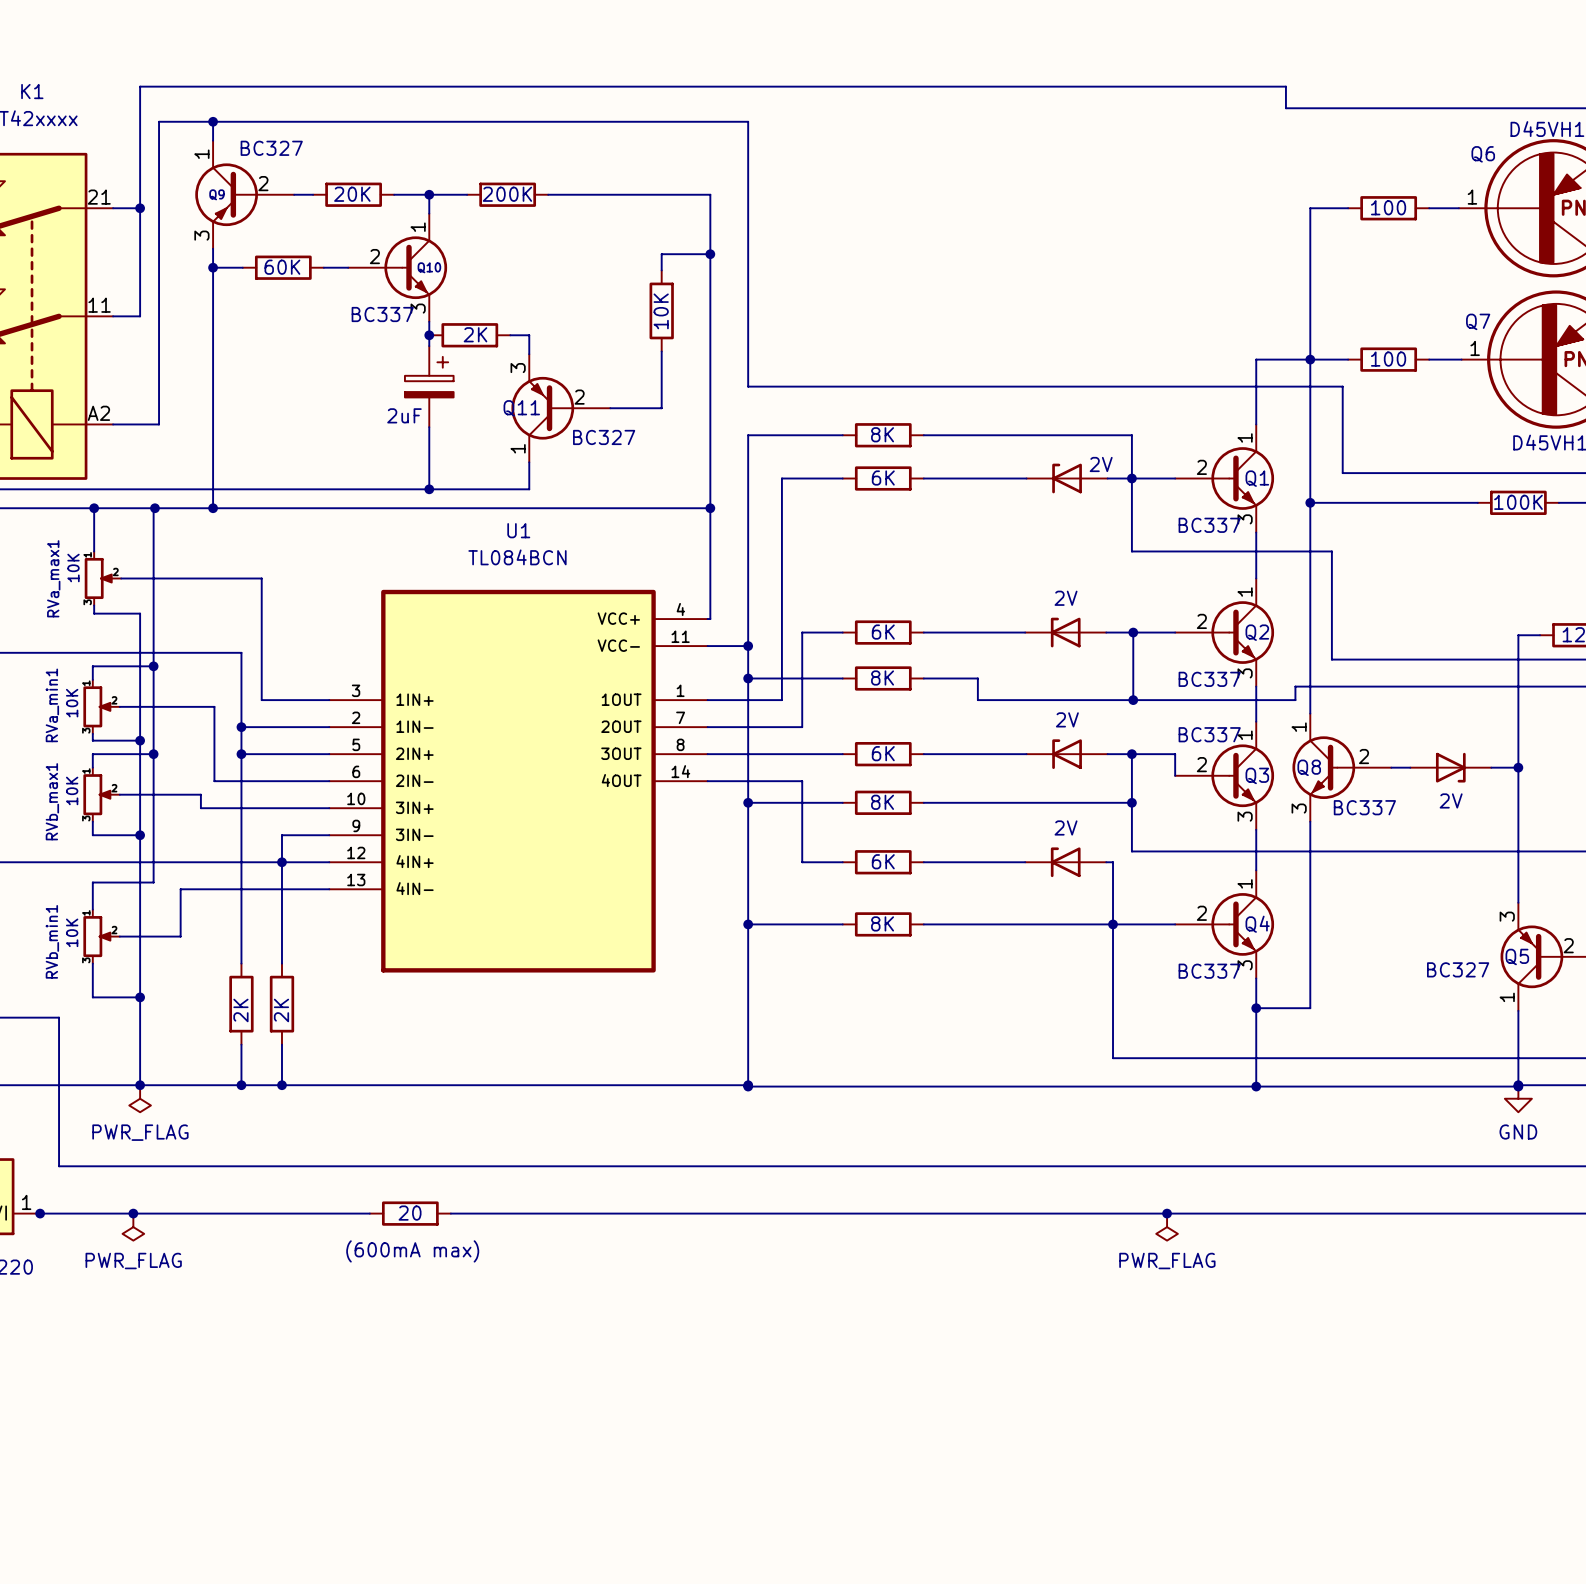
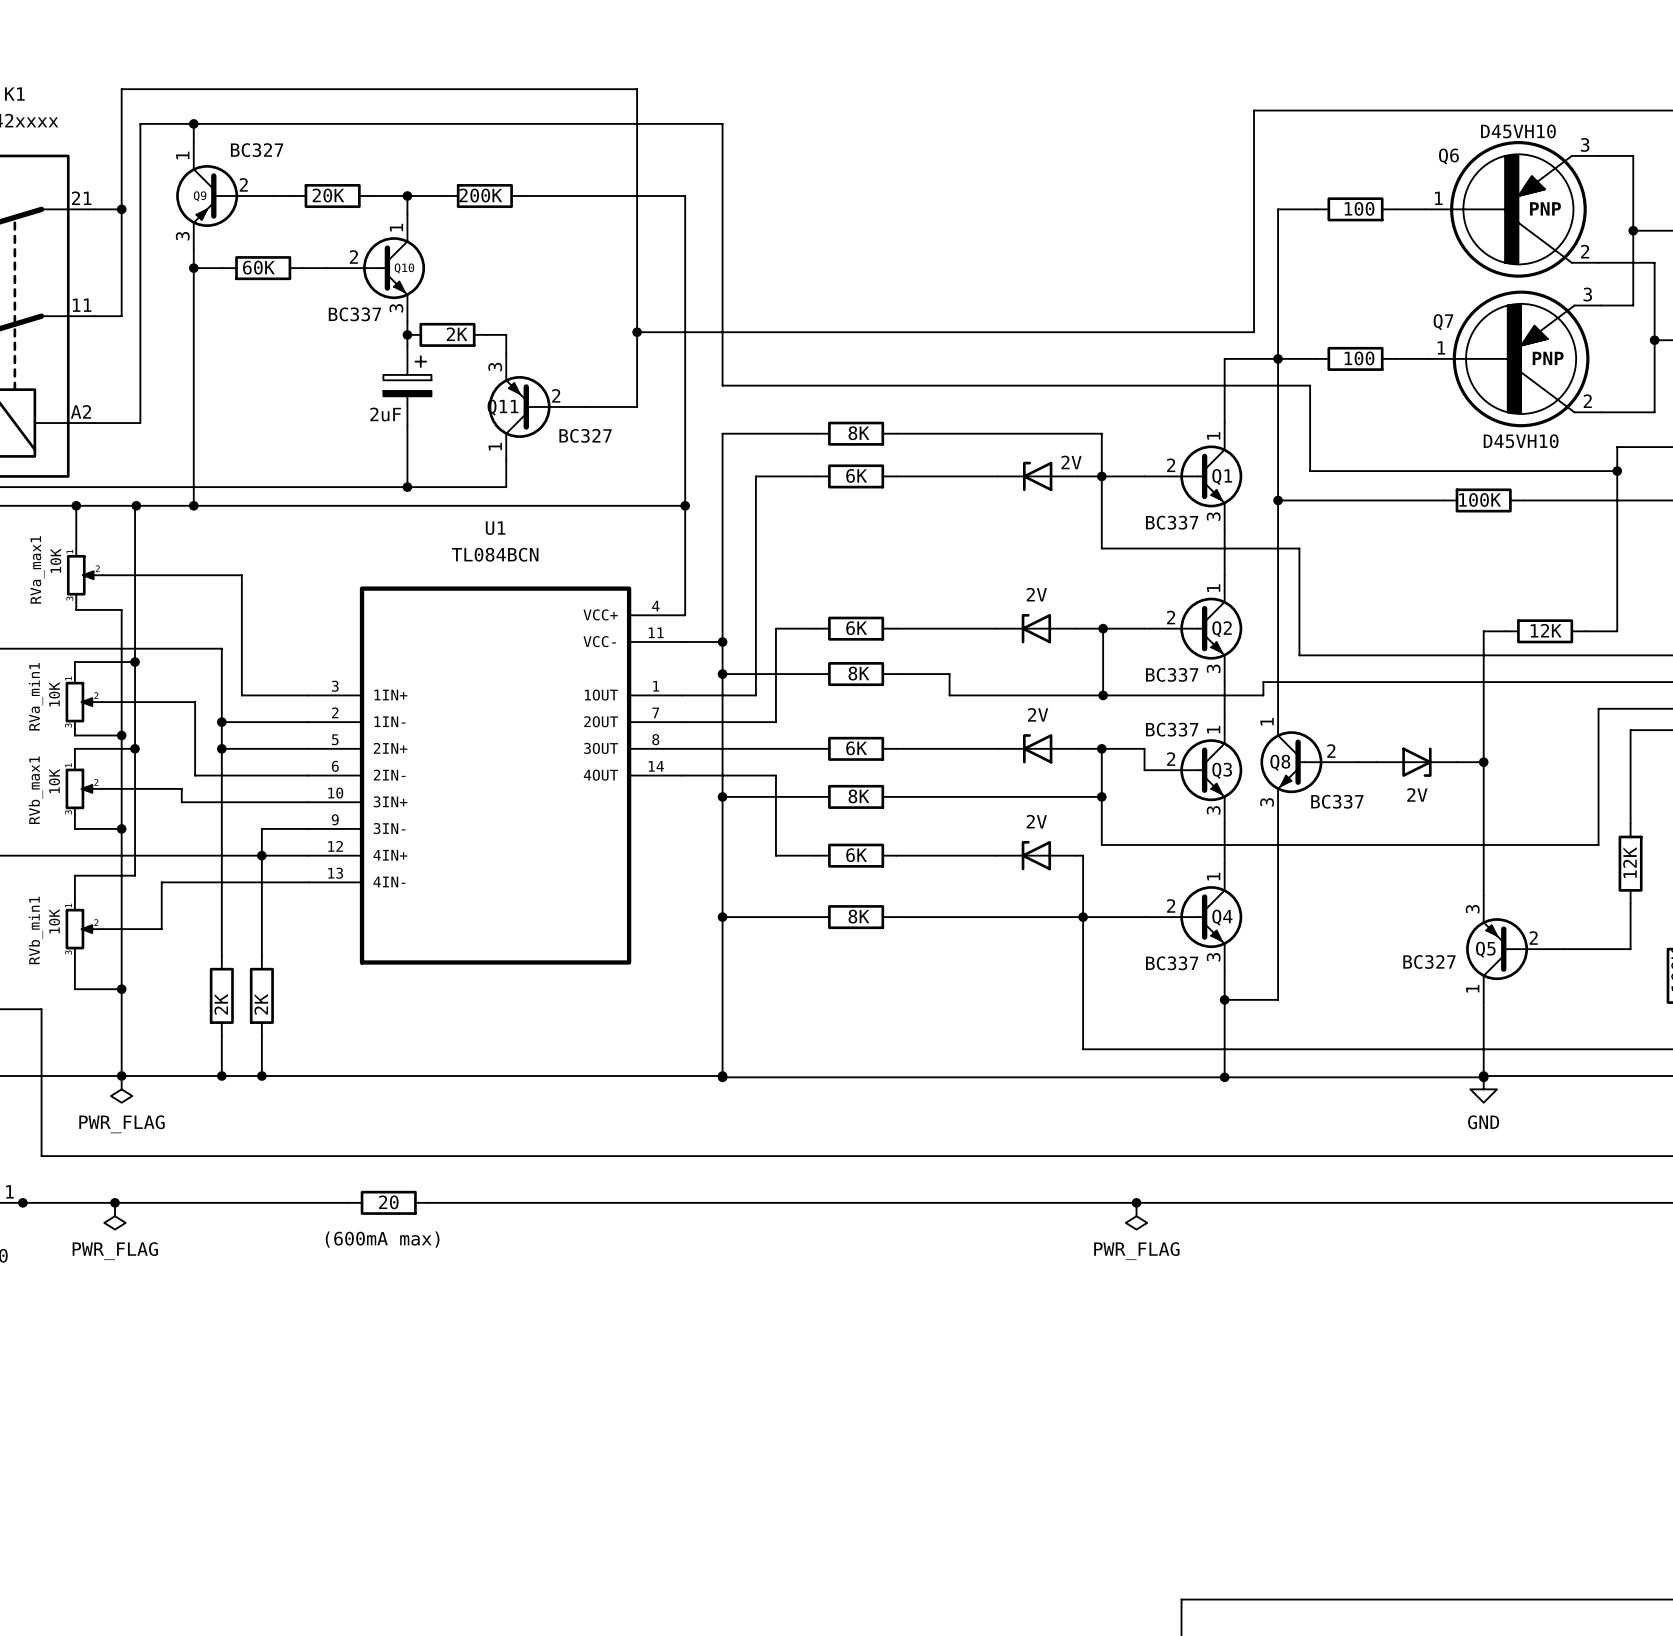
wire: (661, 86) (1285, 86) (1285, 108) -> (637, 332) (1254, 332) (1254, 110)
wire: (661, 254) (710, 254) -> (637, 254) (637, 89)
junction: (710, 254) -> none
wire: none -> (637, 270) (637, 350)
part: 10K (661, 310) -> none
junction: none -> (637, 332)

